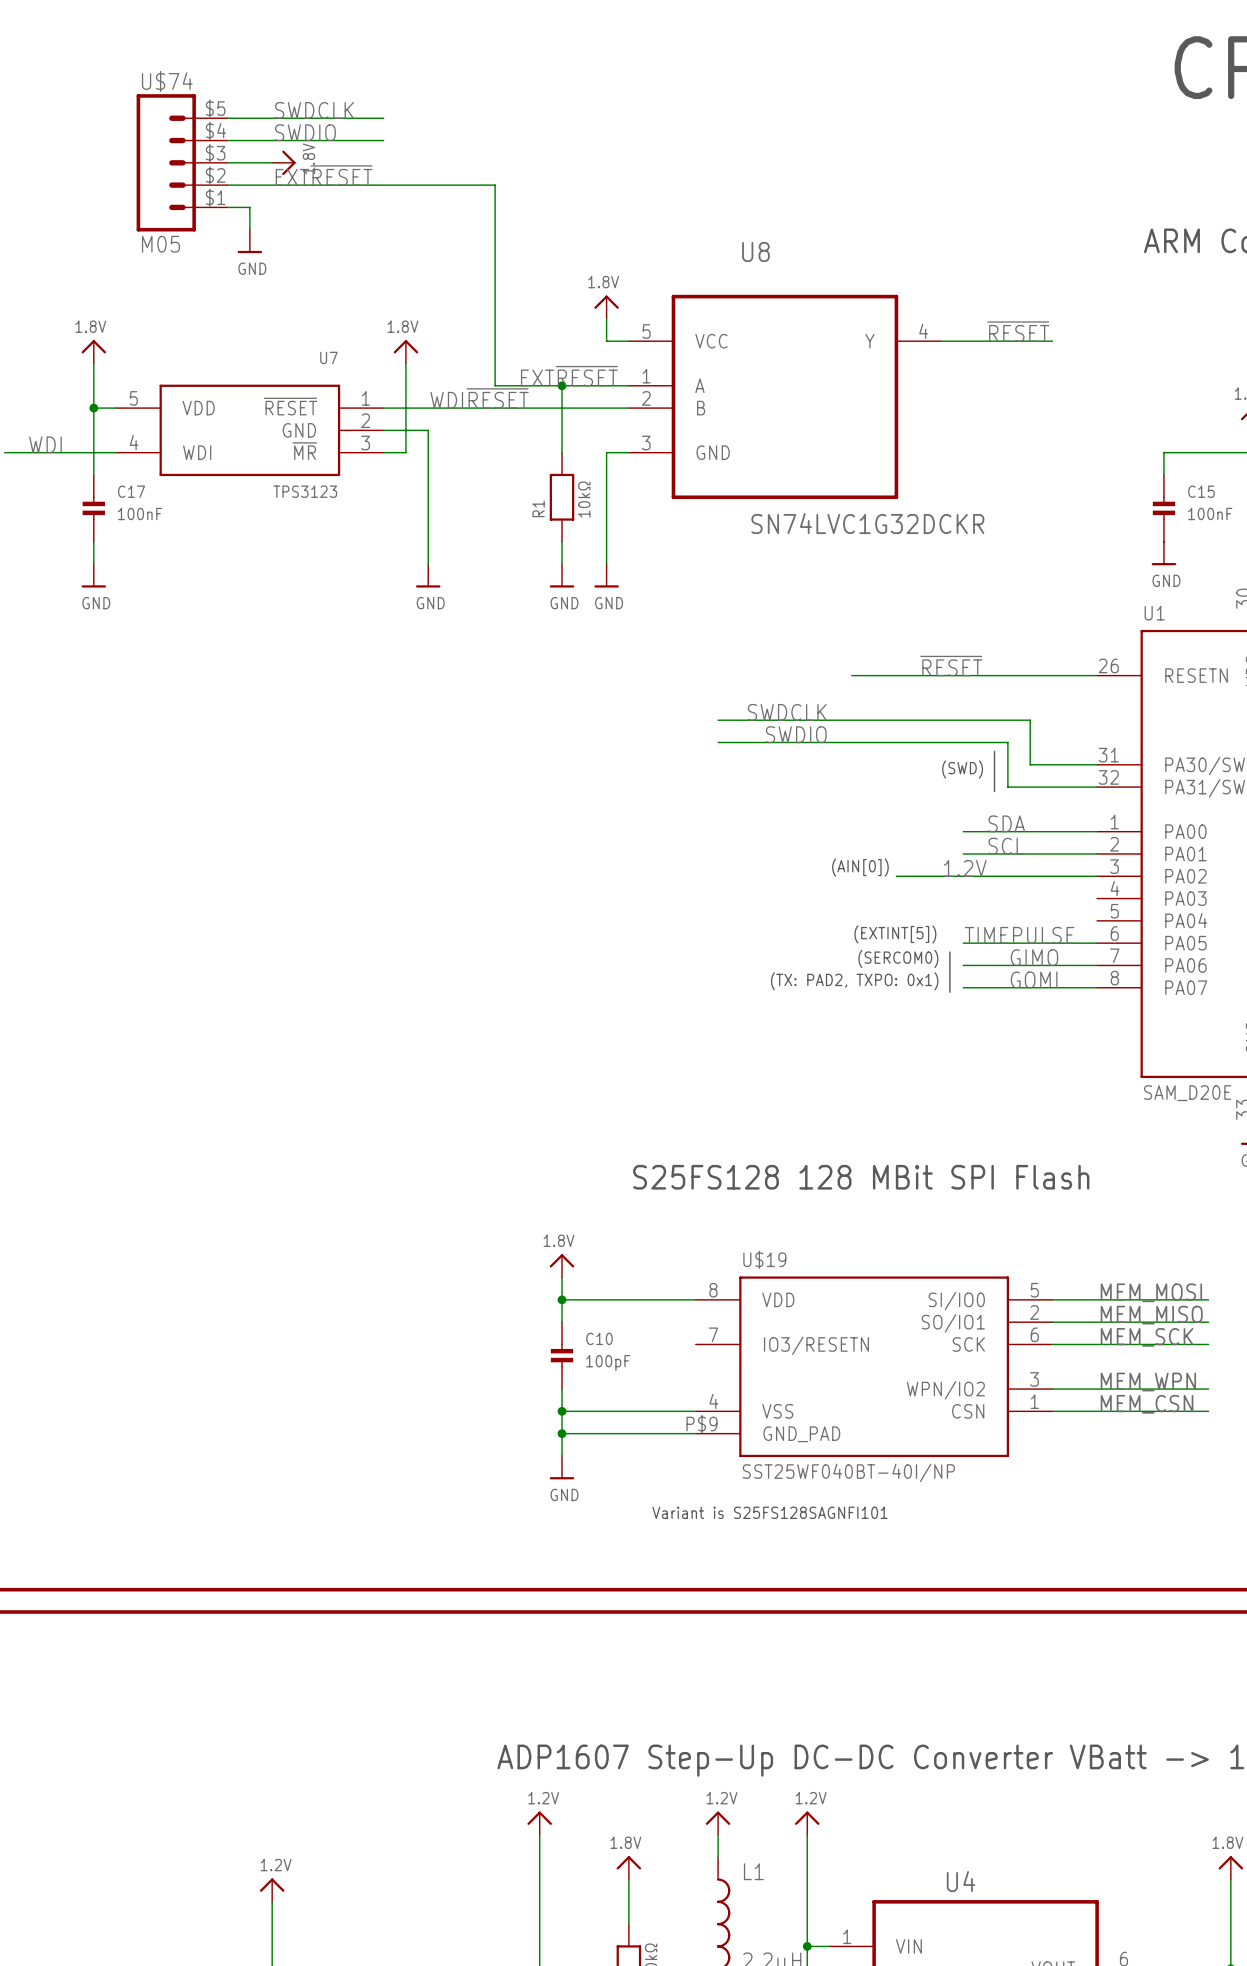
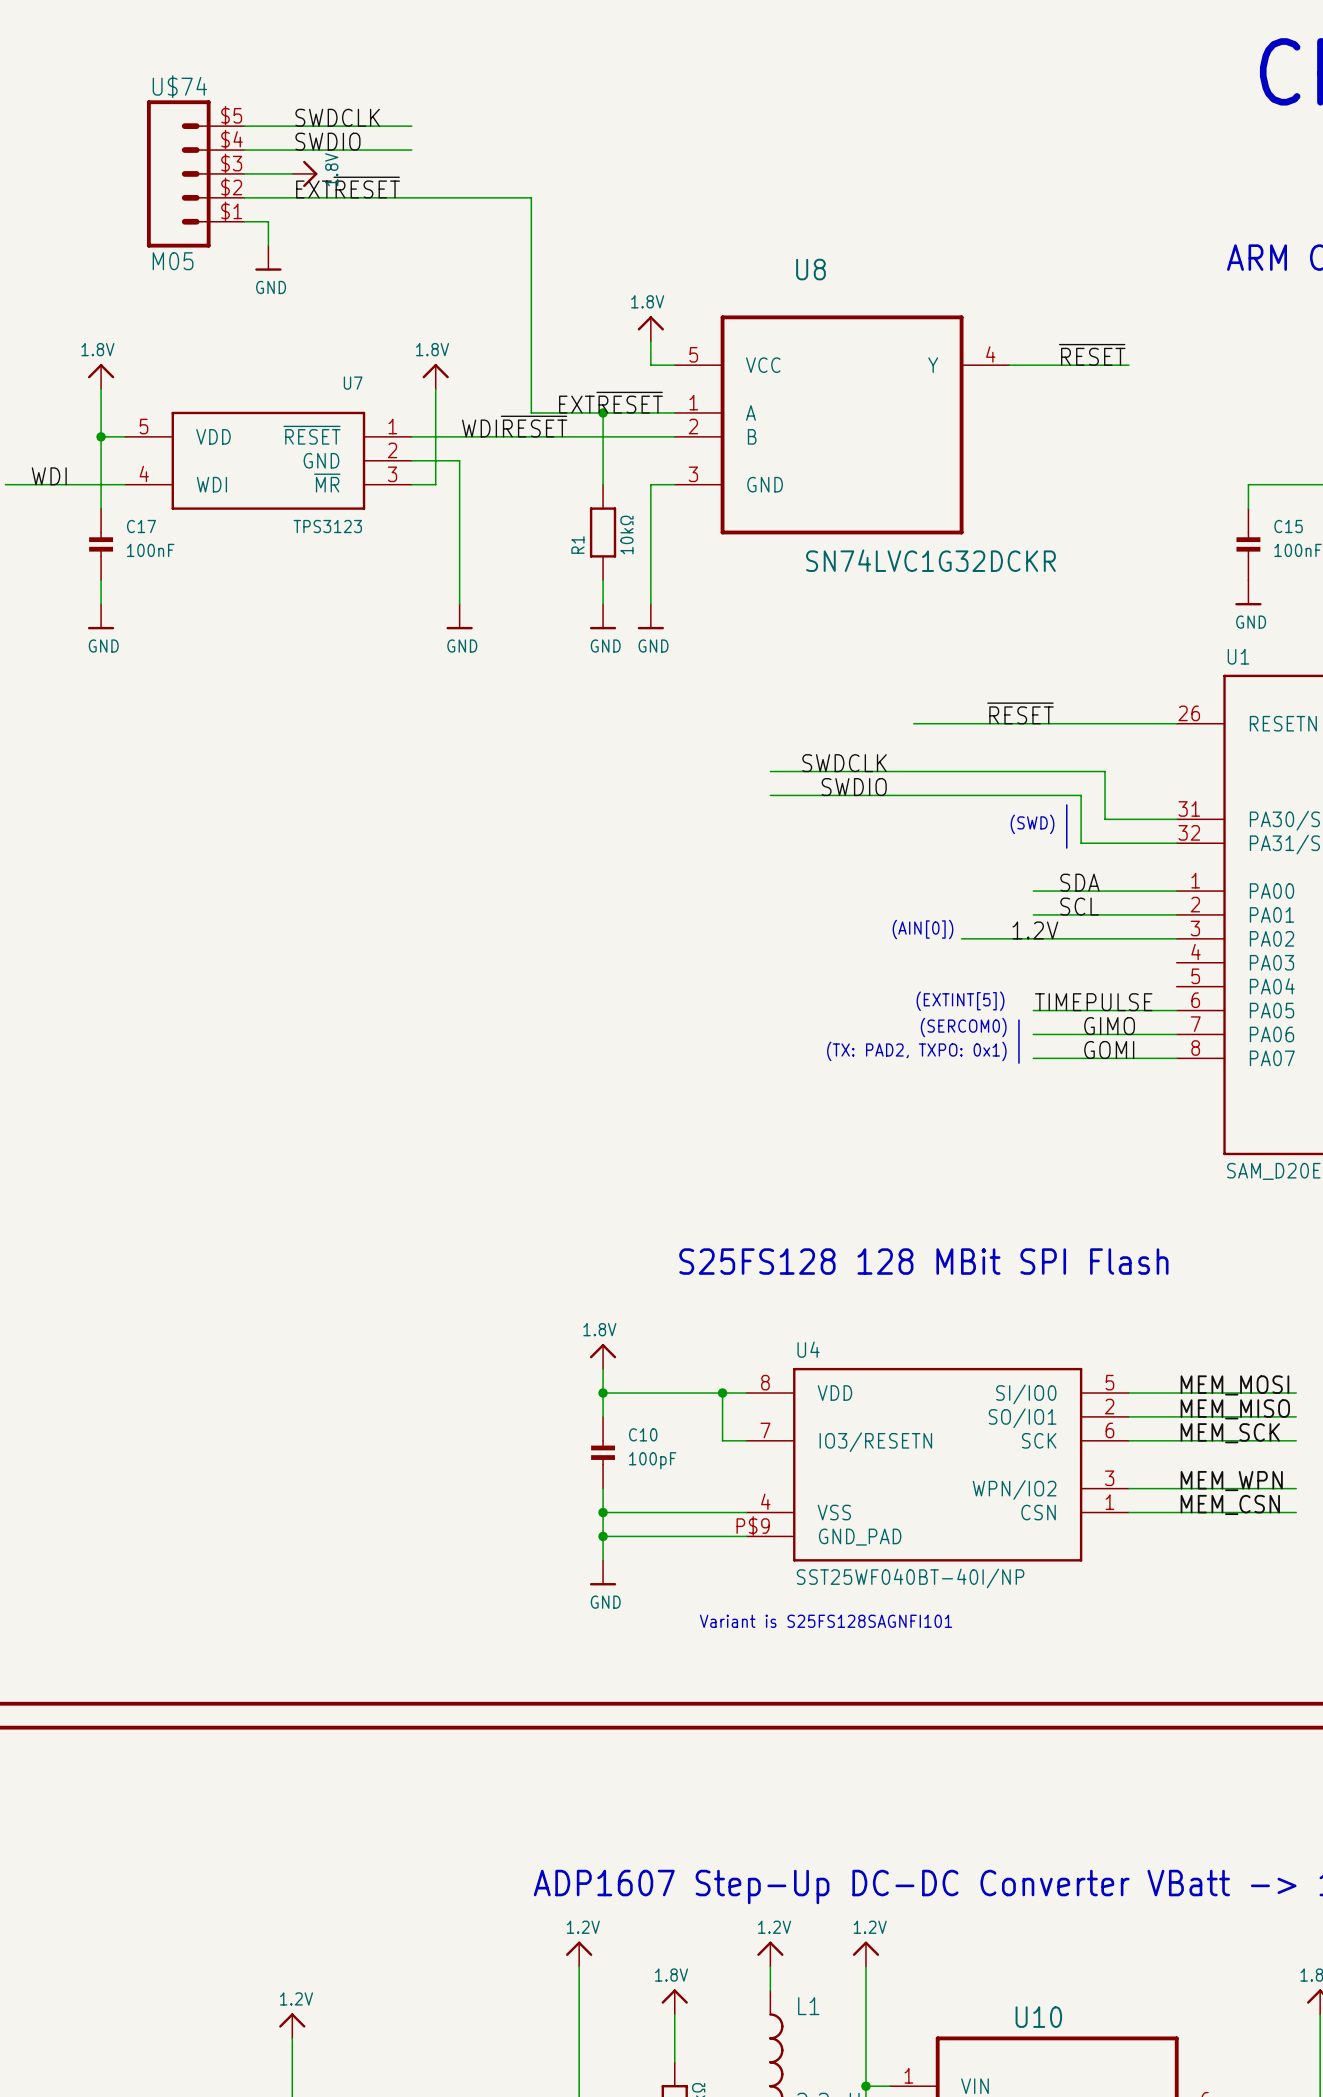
U$19 name: U$19 (764, 1259) -> U4 (808, 1349)
wire: none -> (722, 1393) (722, 1440) (746, 1440)
junction: none -> (722, 1393)
U4 name: U4 (961, 1881) -> U10 (1038, 2017)

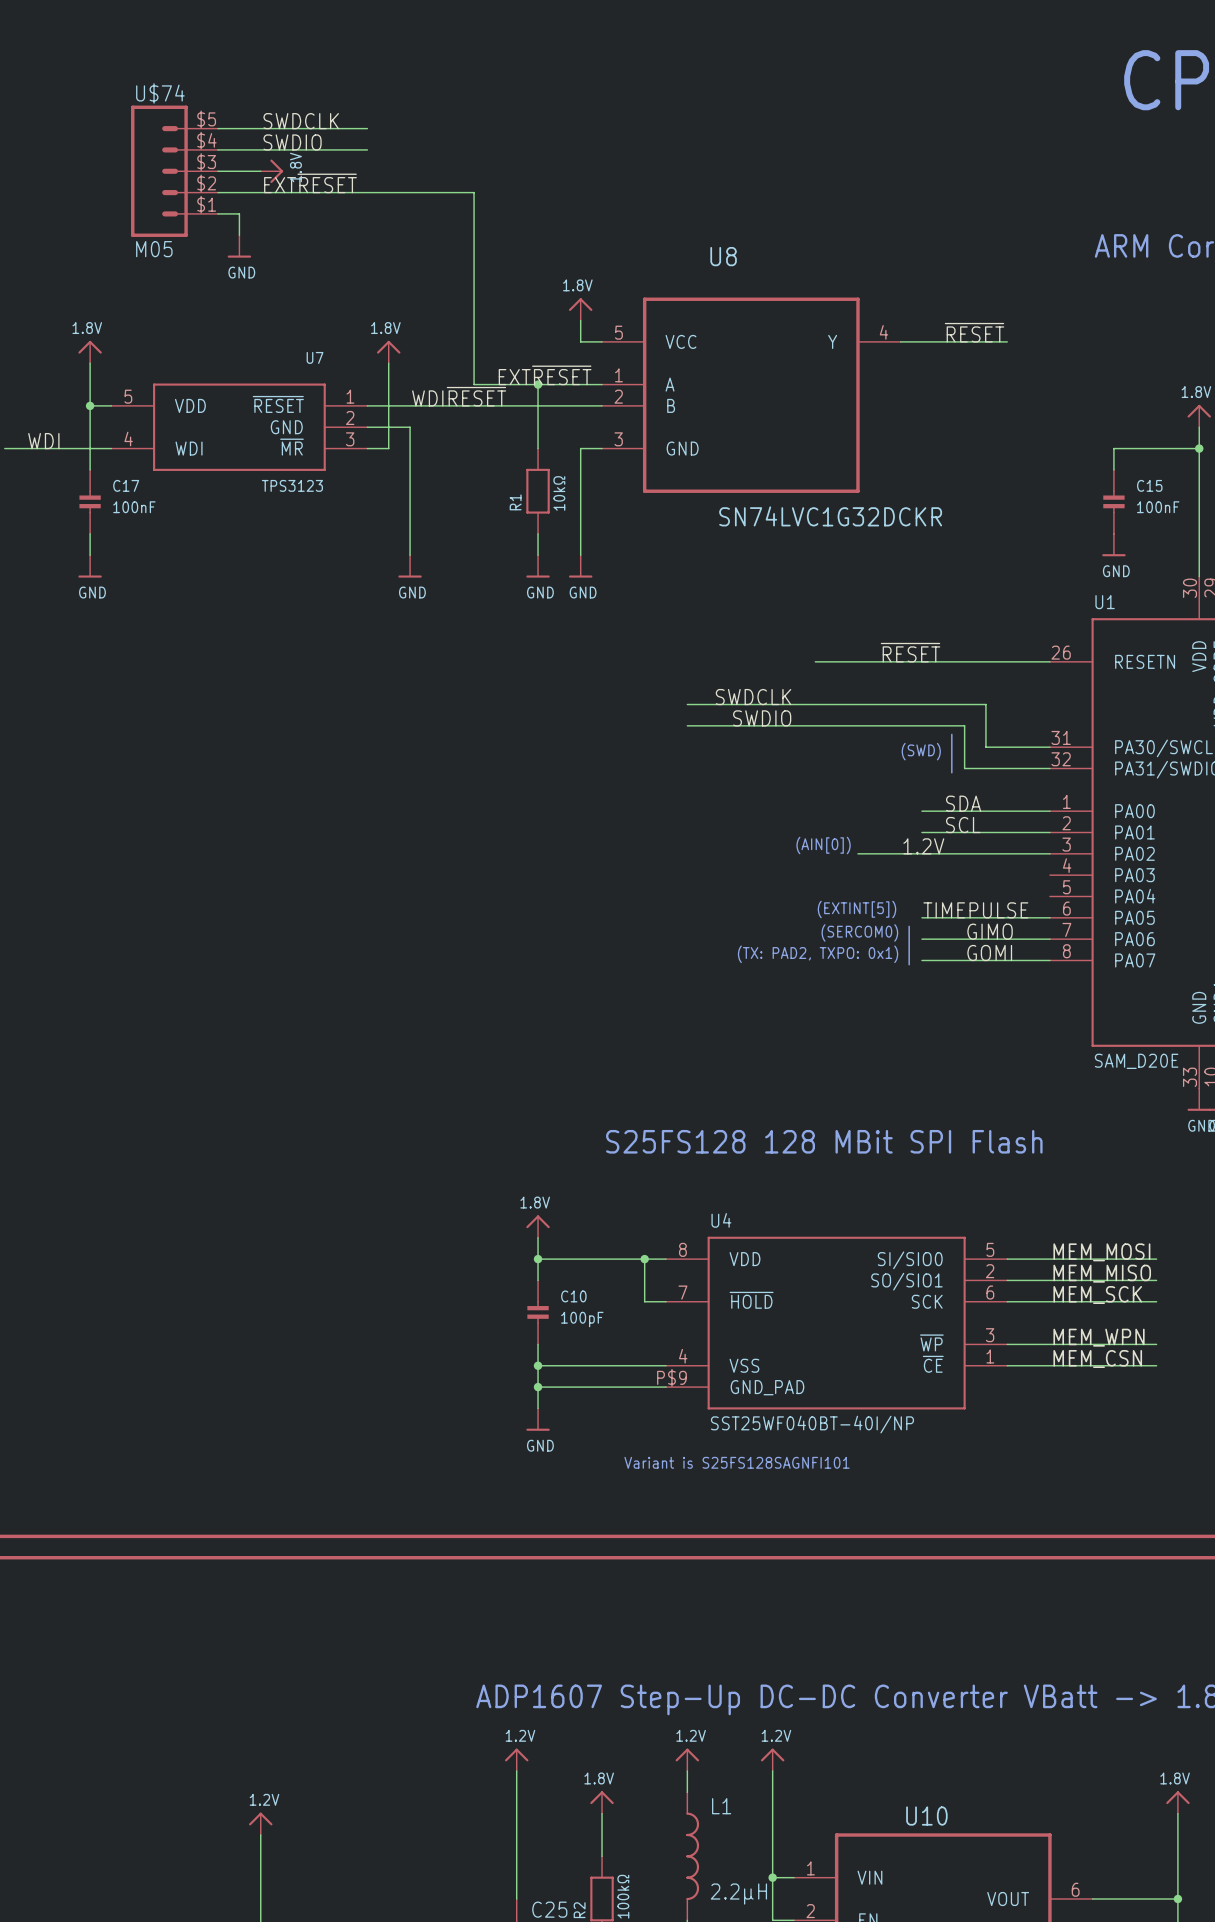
U4 pin name: SI/IO0 (1026, 1394) -> SI/SIO0 (910, 1260)
U4 pin name: SO/IO1 (1022, 1418) -> SO/SIO1 (906, 1281)
U4 pin name: IO3/RESETN (875, 1442) -> ~{HOLD} (751, 1300)
U4 pin name: WPN/IO2 (1014, 1489) -> ~{WP} (931, 1342)
U4 pin name: CSN (1038, 1512) -> ~{CE} (933, 1364)

